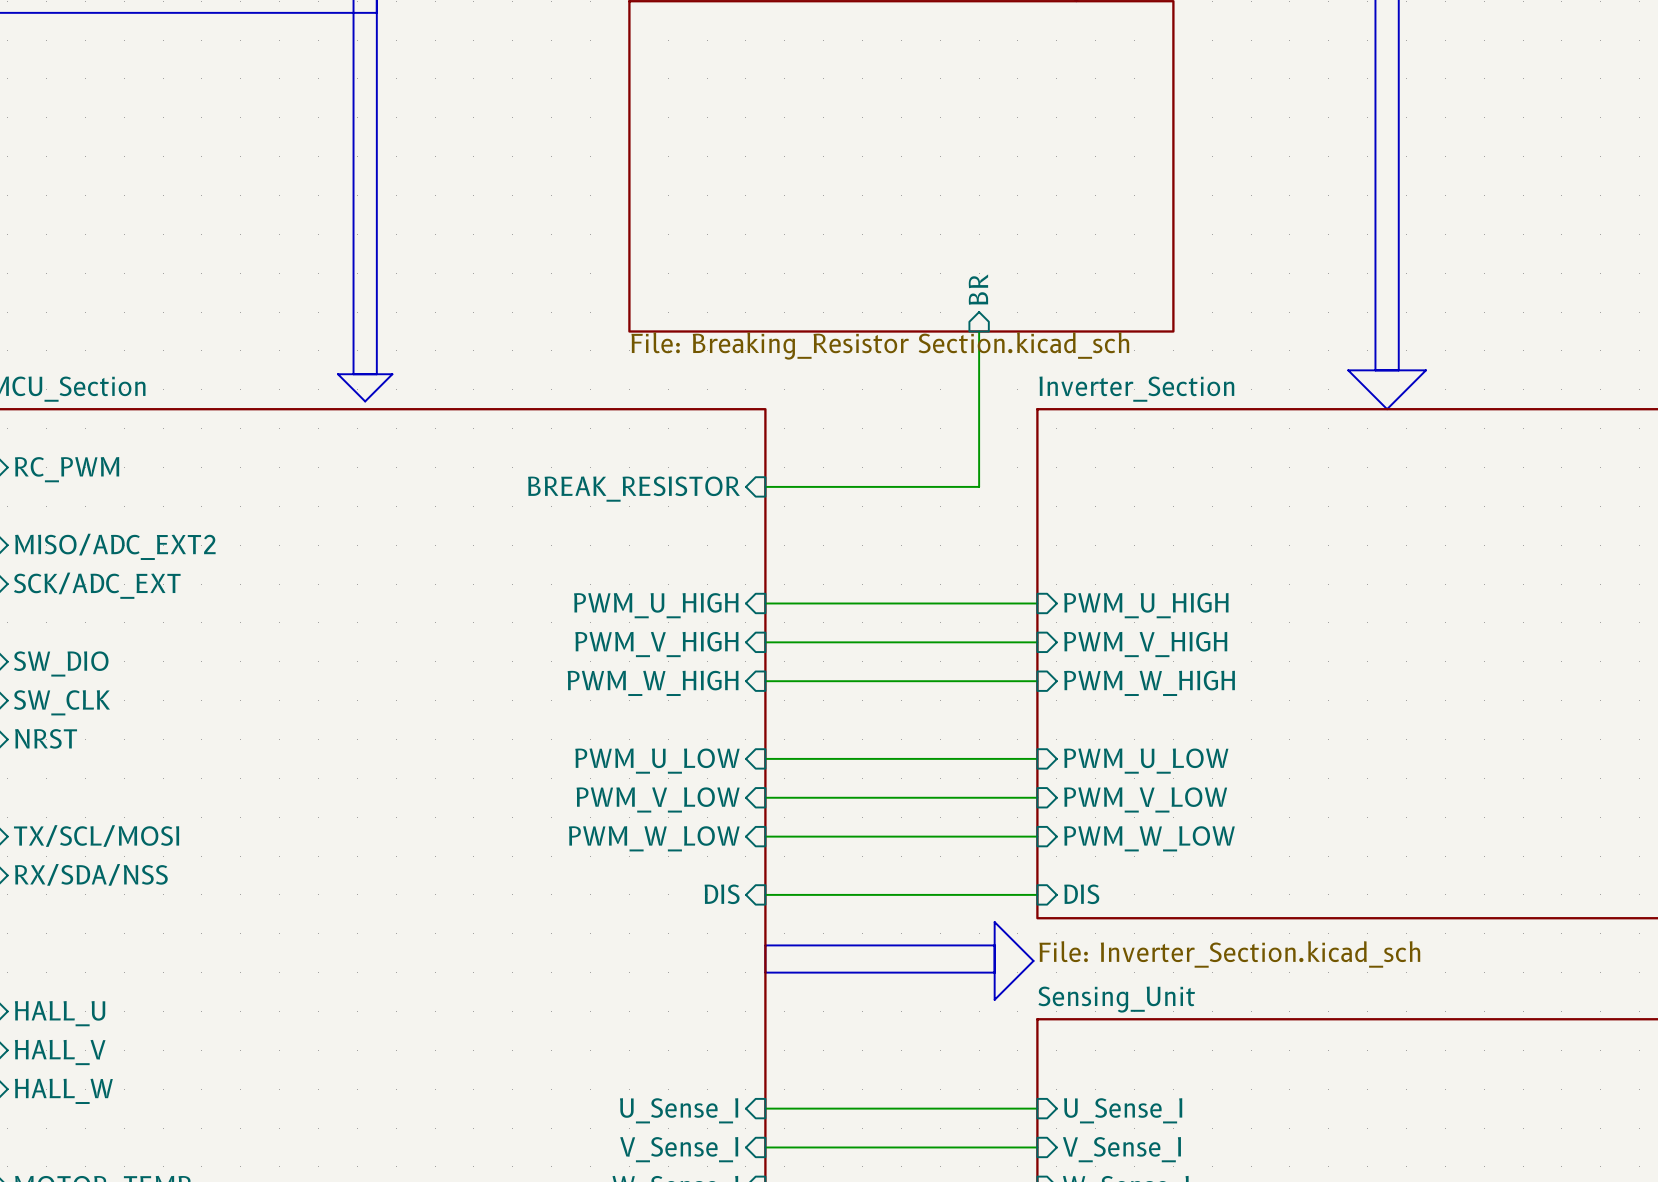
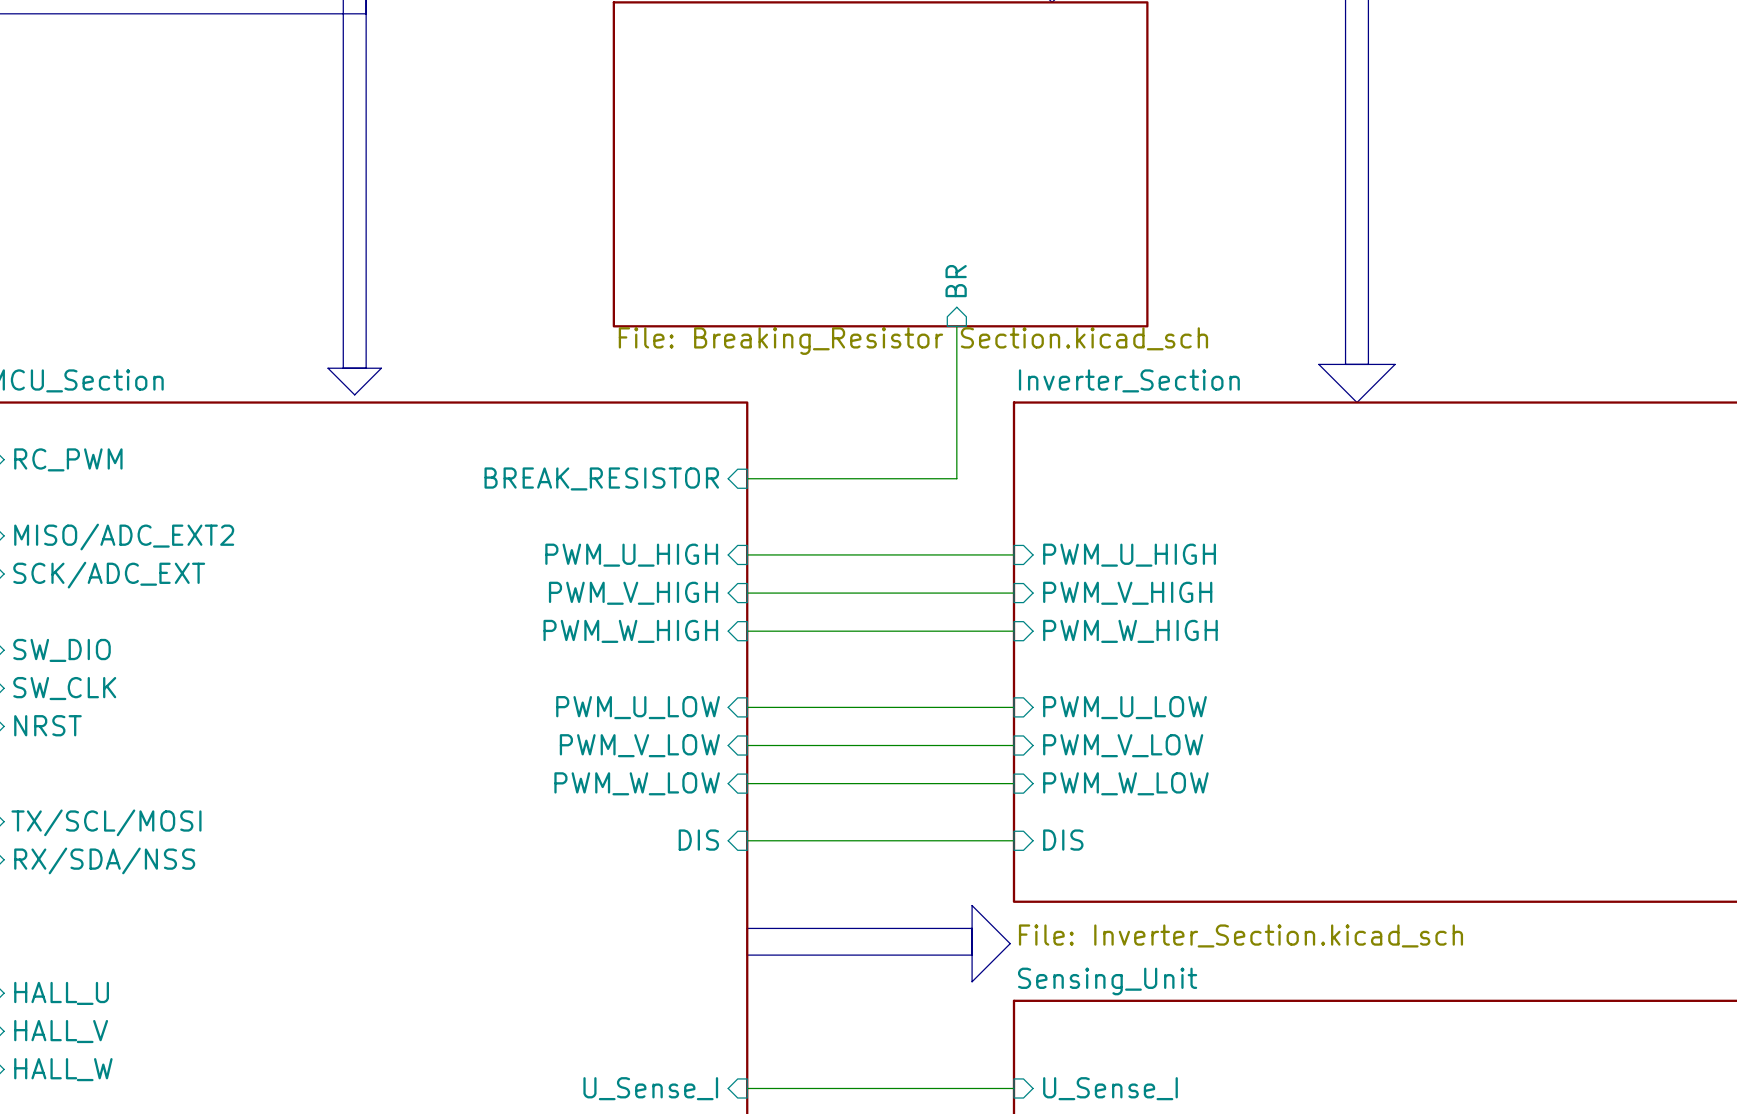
sheet pin: none -> PWM_U_HIGH (631, 555)
sheet pin: none -> PWM_U_HIGH (1129, 555)
sheet pin: PWM_U_HIGH (656, 605) -> PWM_V_HIGH (633, 593)
sheet pin: PWM_U_HIGH (1146, 605) -> PWM_V_HIGH (1127, 593)
sheet pin: PWM_V_HIGH (656, 644) -> PWM_W_HIGH (630, 631)
sheet pin: PWM_V_HIGH (1145, 644) -> PWM_W_HIGH (1130, 631)
wire: (765, 681) (1037, 681) -> (747, 554) (1013, 554)
sheet pin: PWM_W_HIGH (653, 683) -> none
sheet pin: PWM_W_HIGH (1149, 683) -> none
sheet pin: none -> PWM_U_LOW (638, 707)
sheet pin: none -> PWM_U_LOW (1124, 707)
sheet pin: PWM_U_LOW (657, 761) -> PWM_V_LOW (639, 745)
sheet pin: PWM_U_LOW (1146, 761) -> PWM_V_LOW (1123, 745)
sheet pin: PWM_V_LOW (658, 799) -> PWM_W_LOW (637, 783)
sheet pin: PWM_V_LOW (1145, 799) -> PWM_W_LOW (1125, 783)
wire: (765, 836) (1037, 836) -> (747, 707) (1013, 707)
sheet pin: PWM_W_LOW (654, 838) -> none
sheet pin: PWM_W_LOW (1149, 838) -> none
sheet pin position: DIS (722, 894) -> DIS (698, 840)
wire: (765, 894) (1037, 894) -> (747, 840) (1013, 840)
sheet pin position: DIS (1081, 894) -> DIS (1063, 840)

